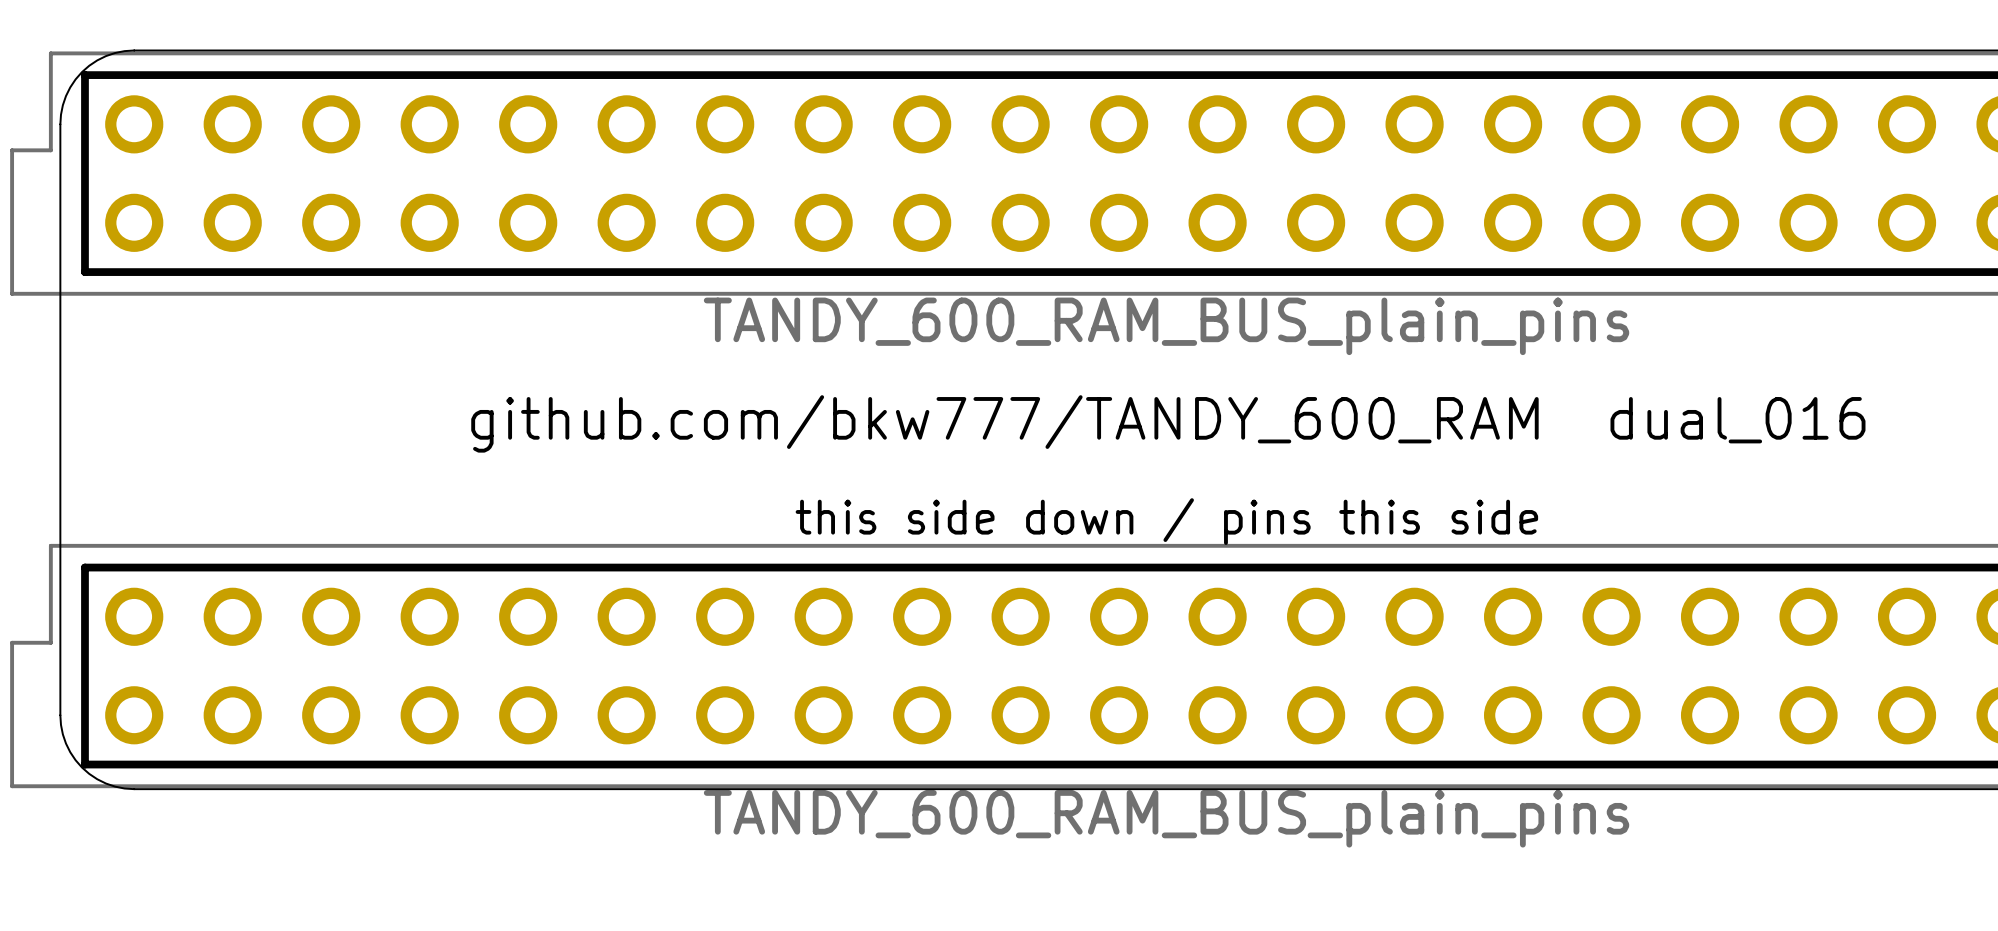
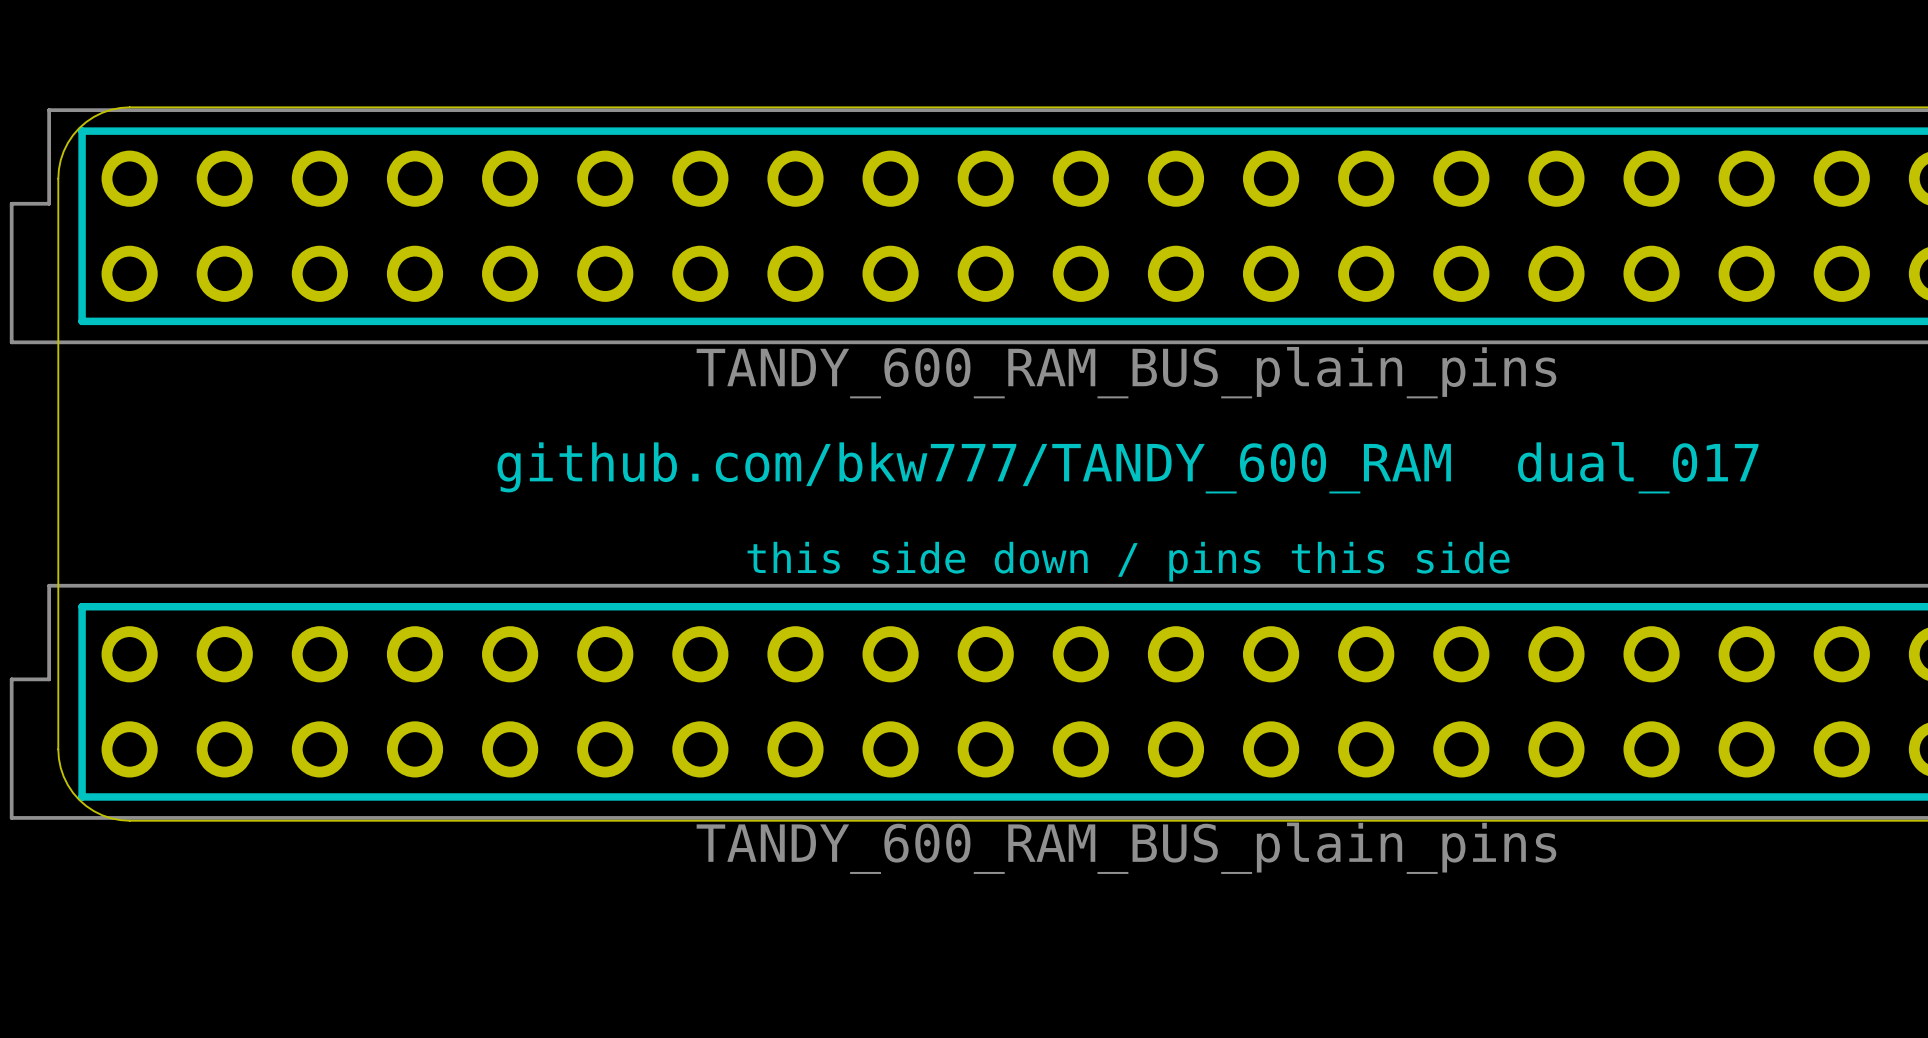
text: github.com/bkw777/TANDY_600_RAM dual_016 (1168, 423) -> github.com/bkw777/TANDY_600_RAM dual_017 (1128, 467)

